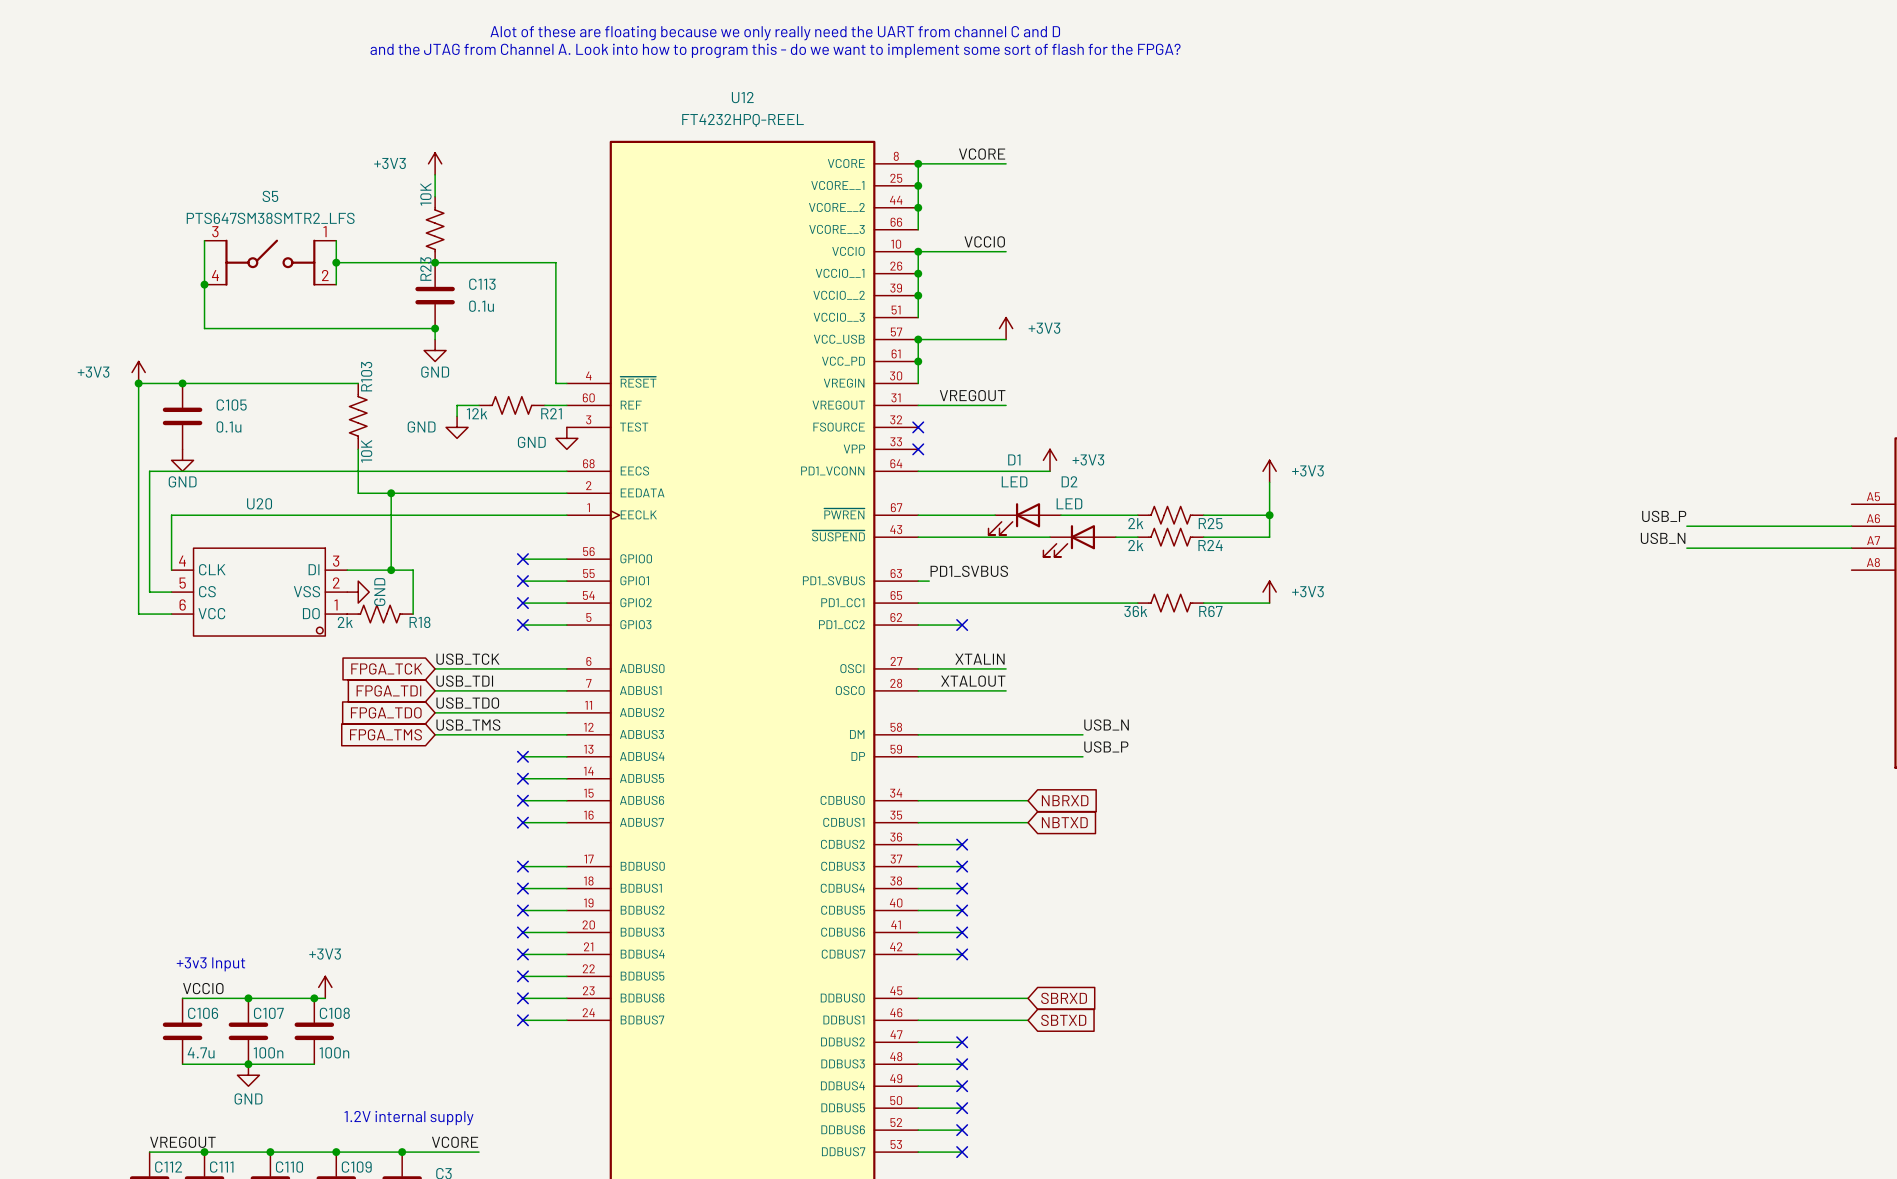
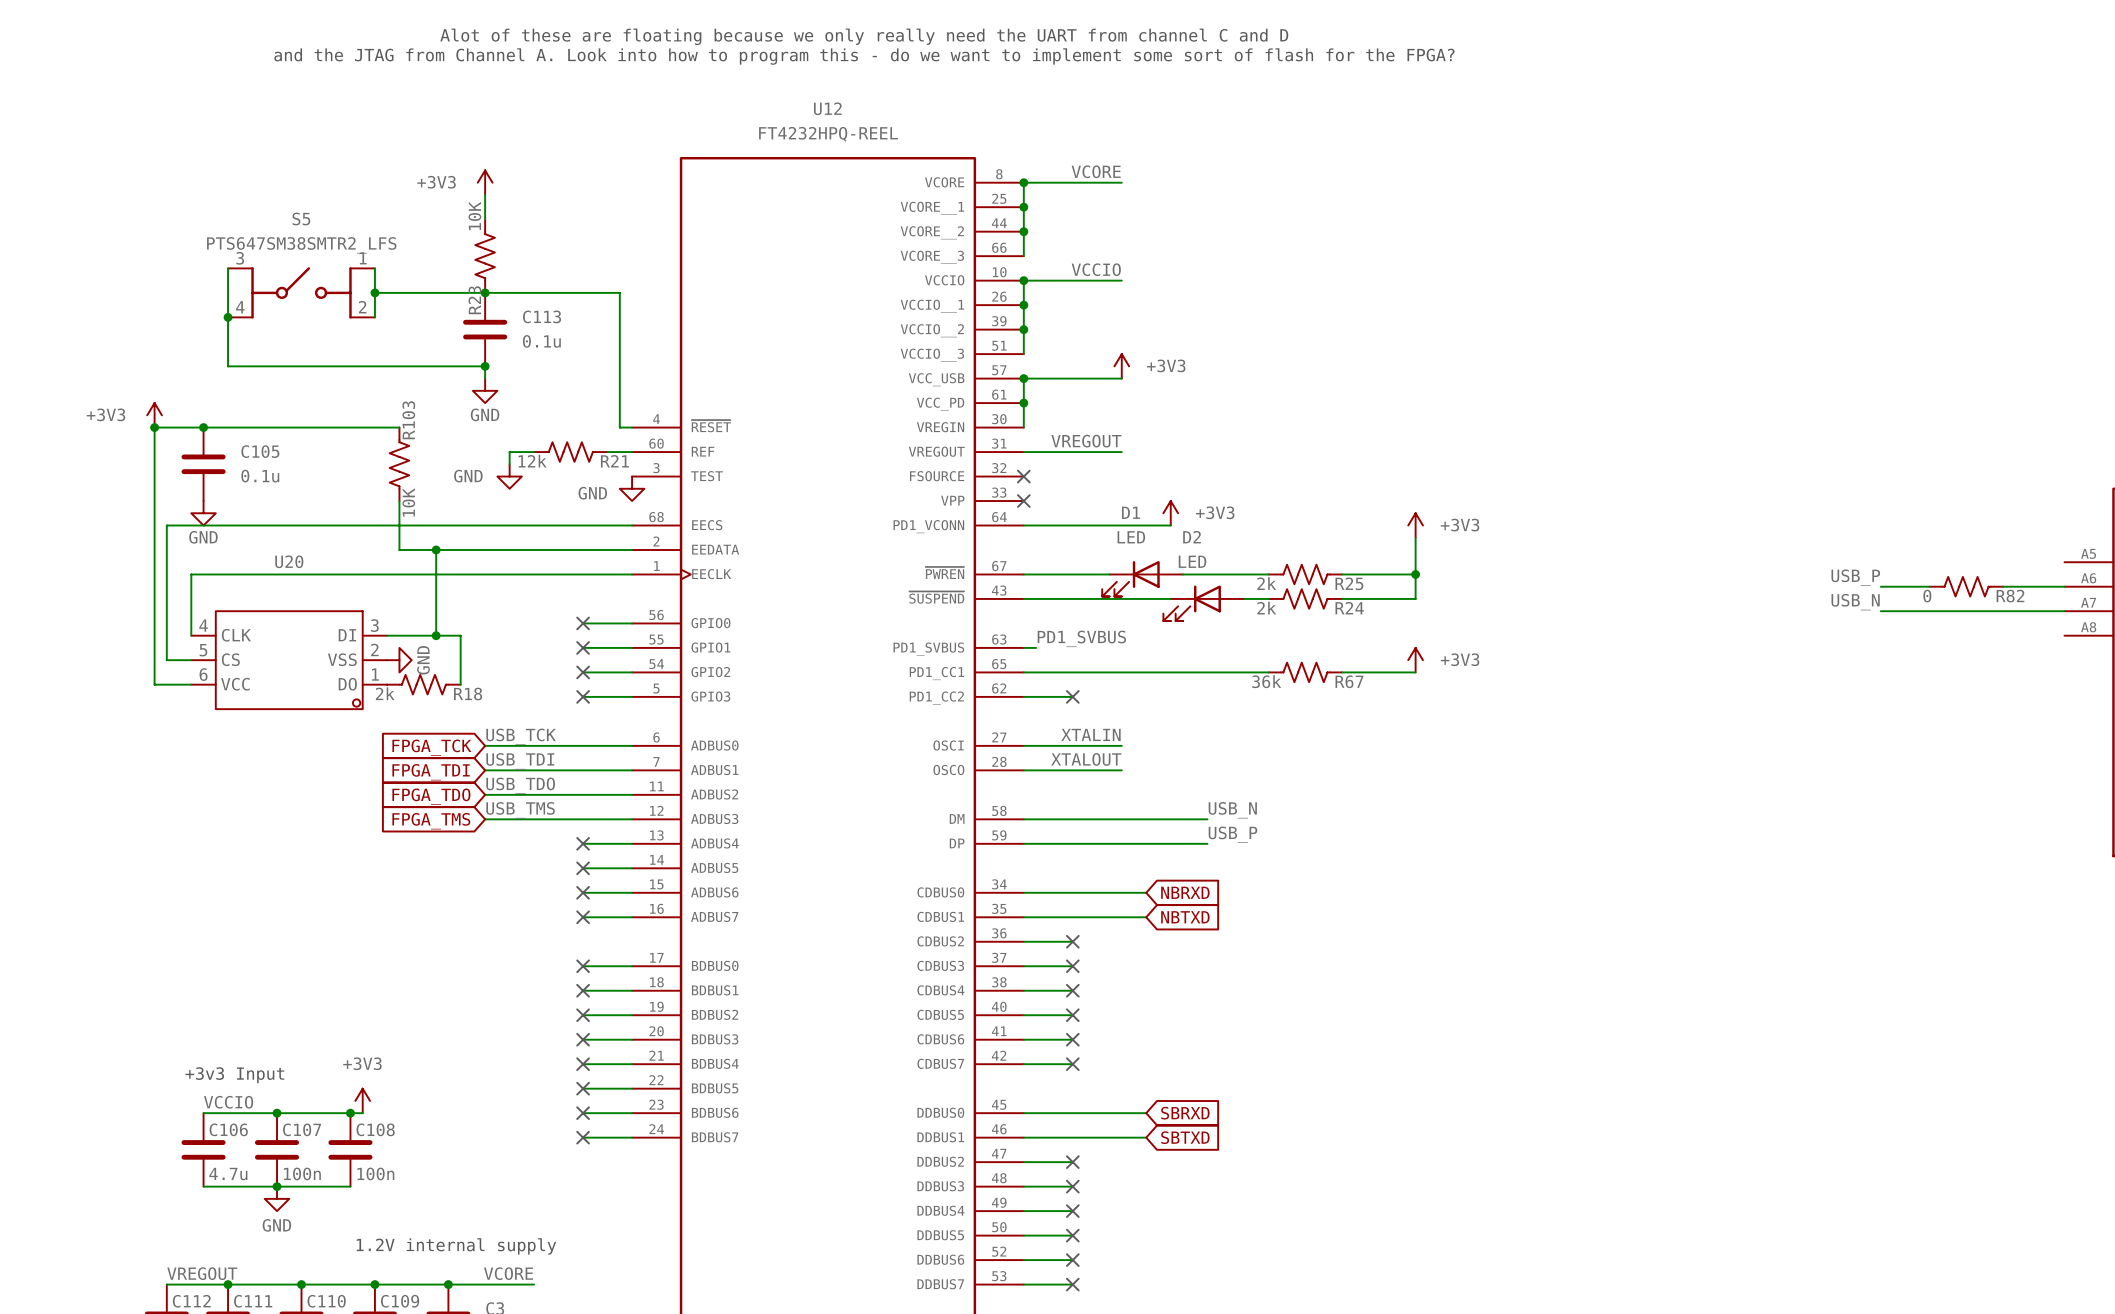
R82: none -> 0 (1966, 586)

